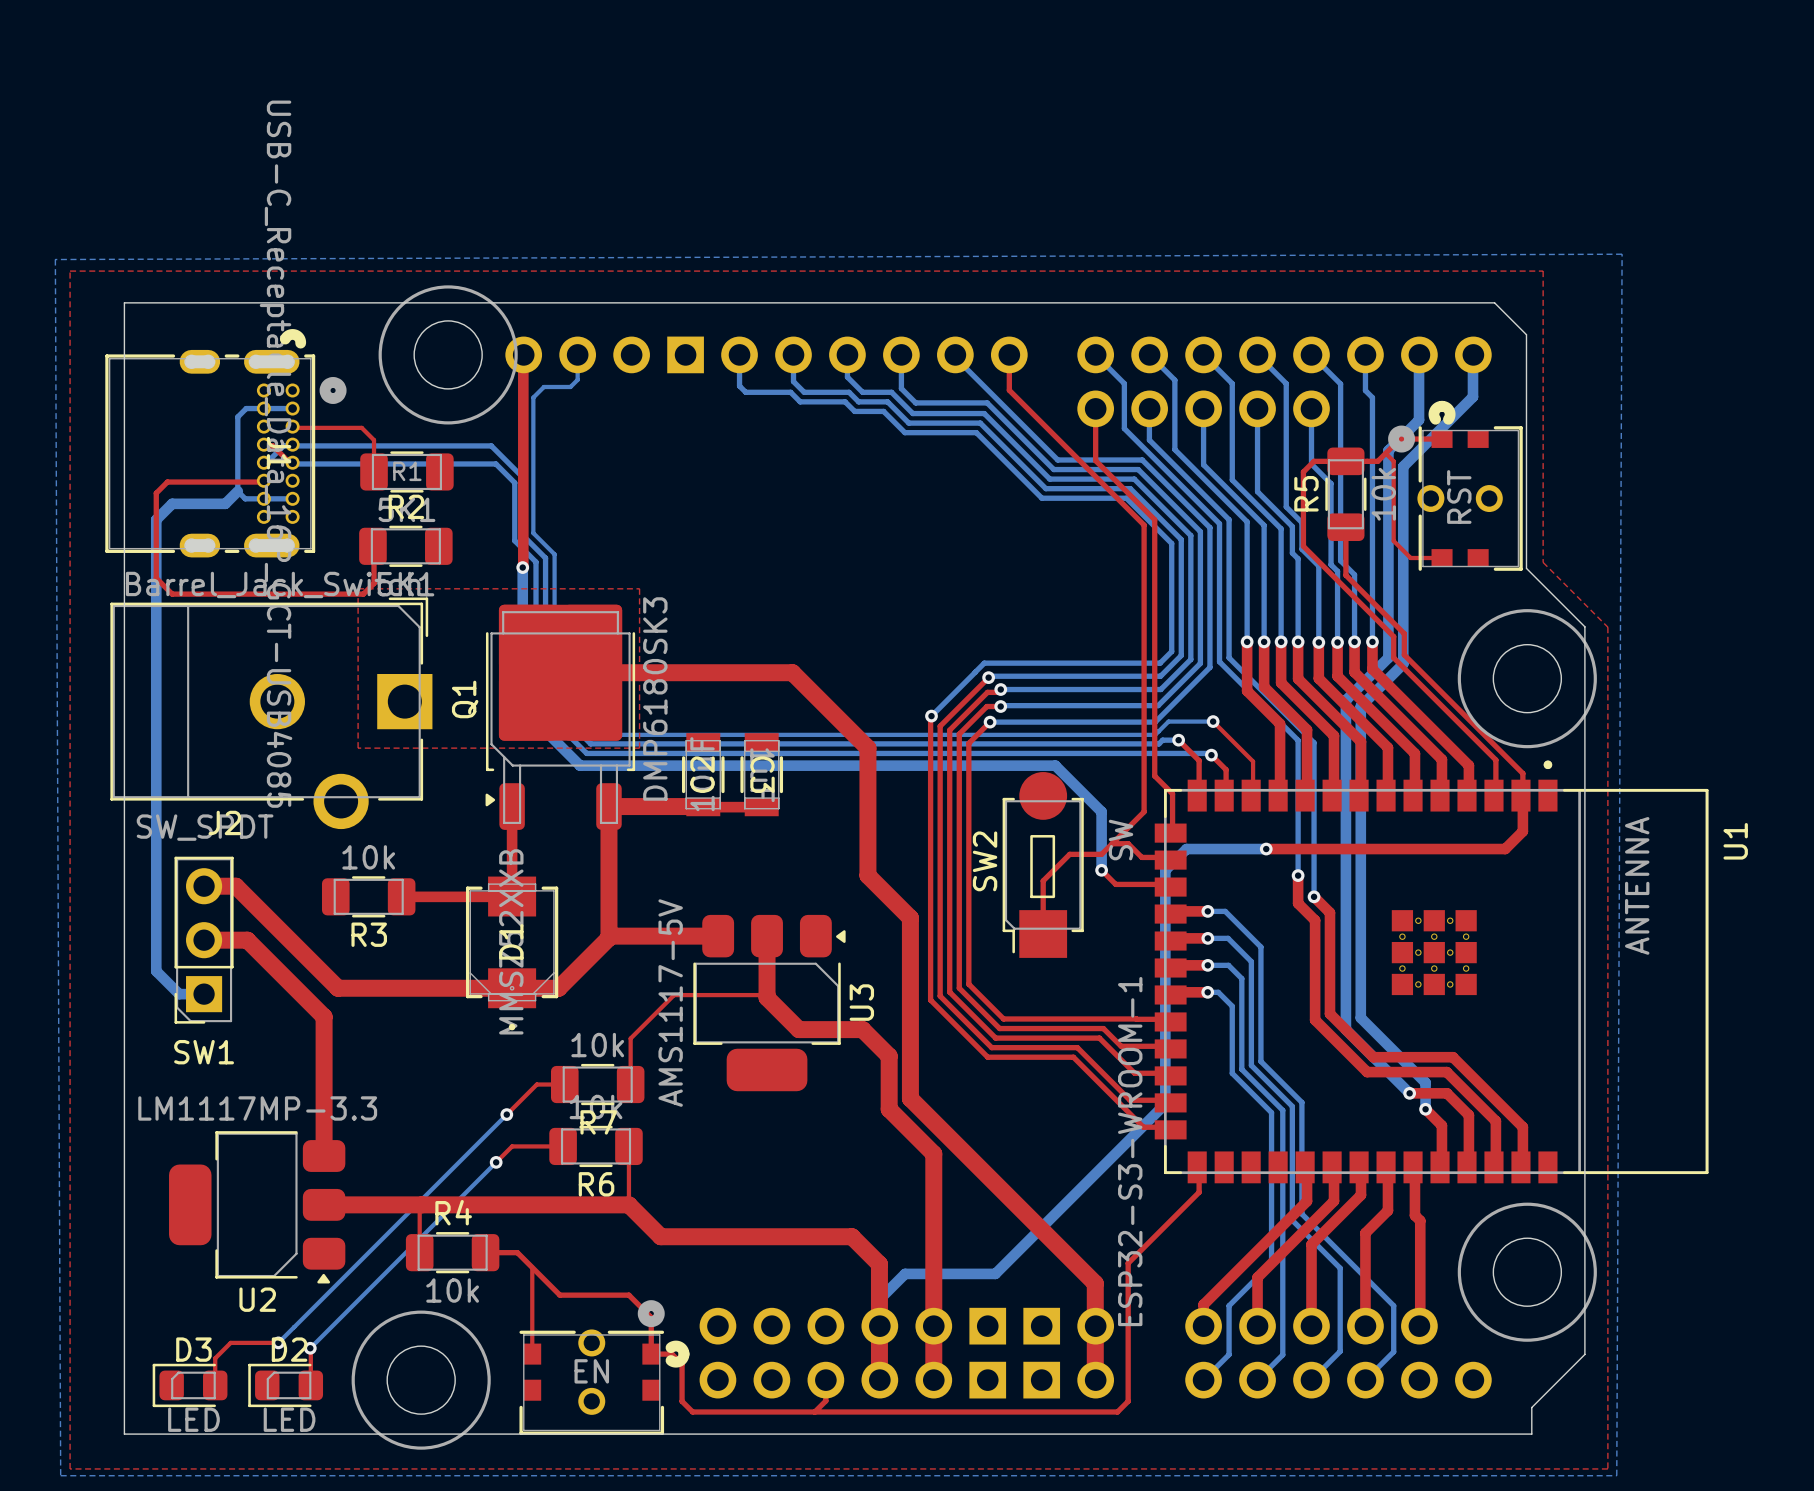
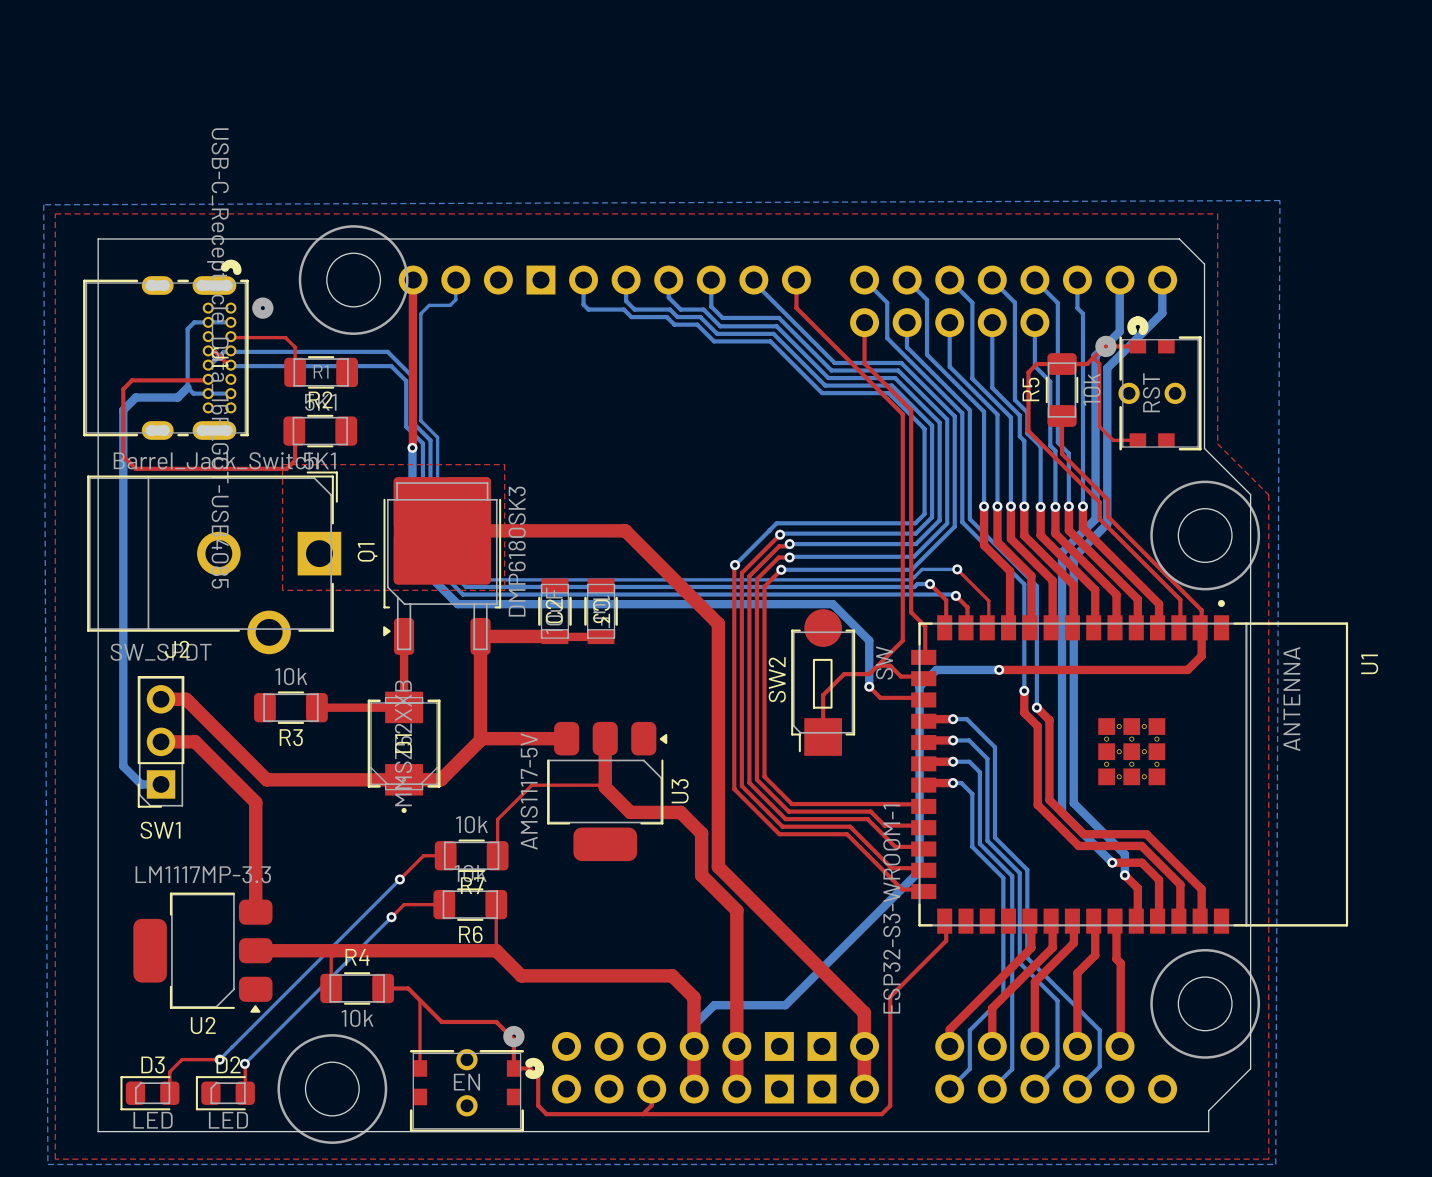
top track: (867, 748) (867, 875) (910, 918) -> (684, 590) (718, 623) (718, 724)

